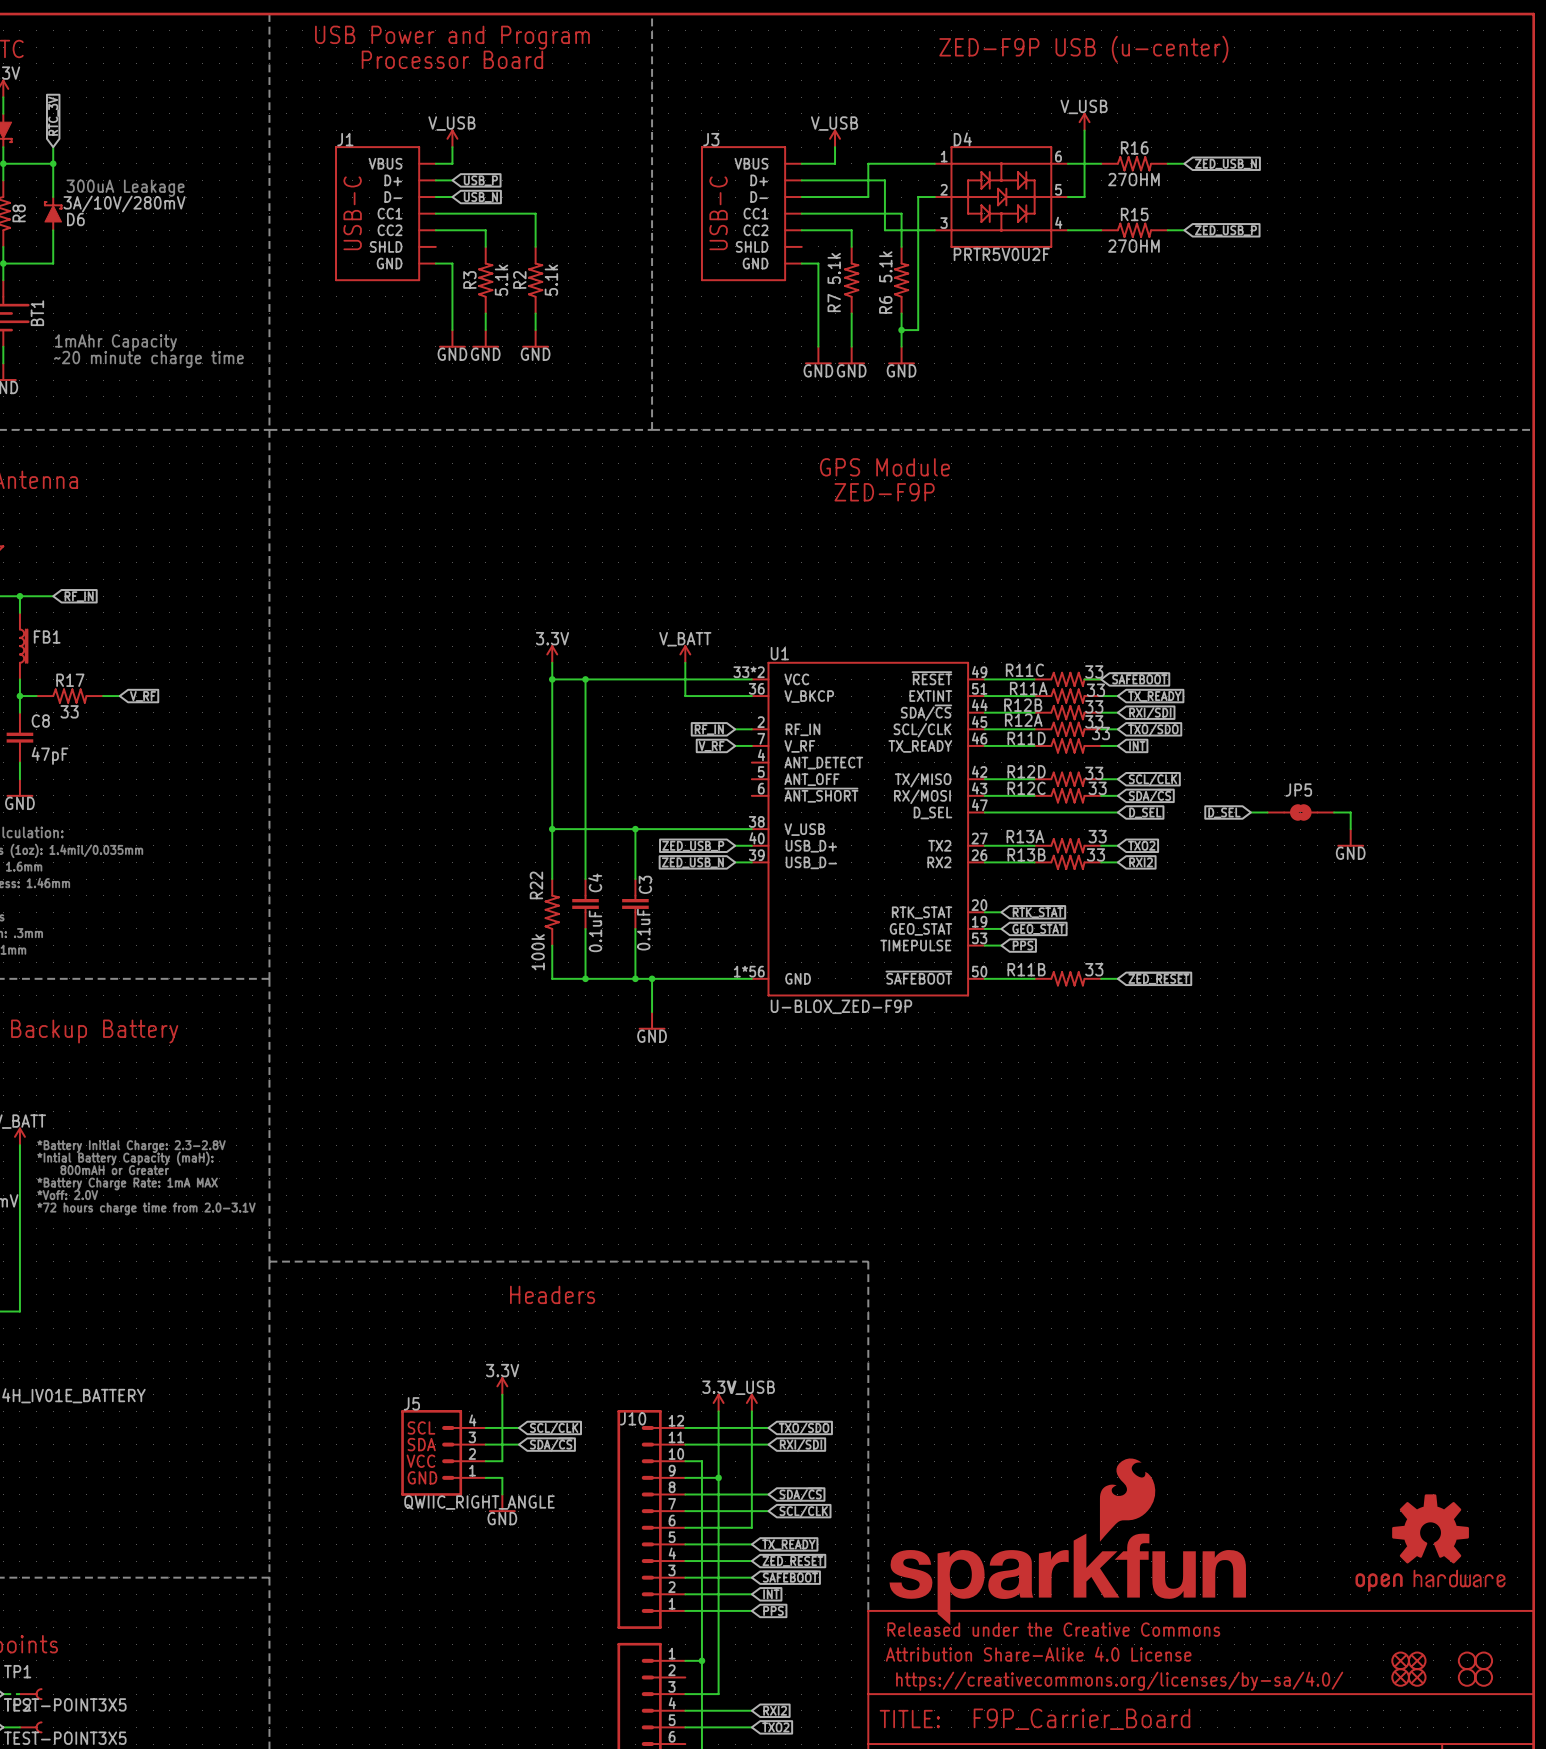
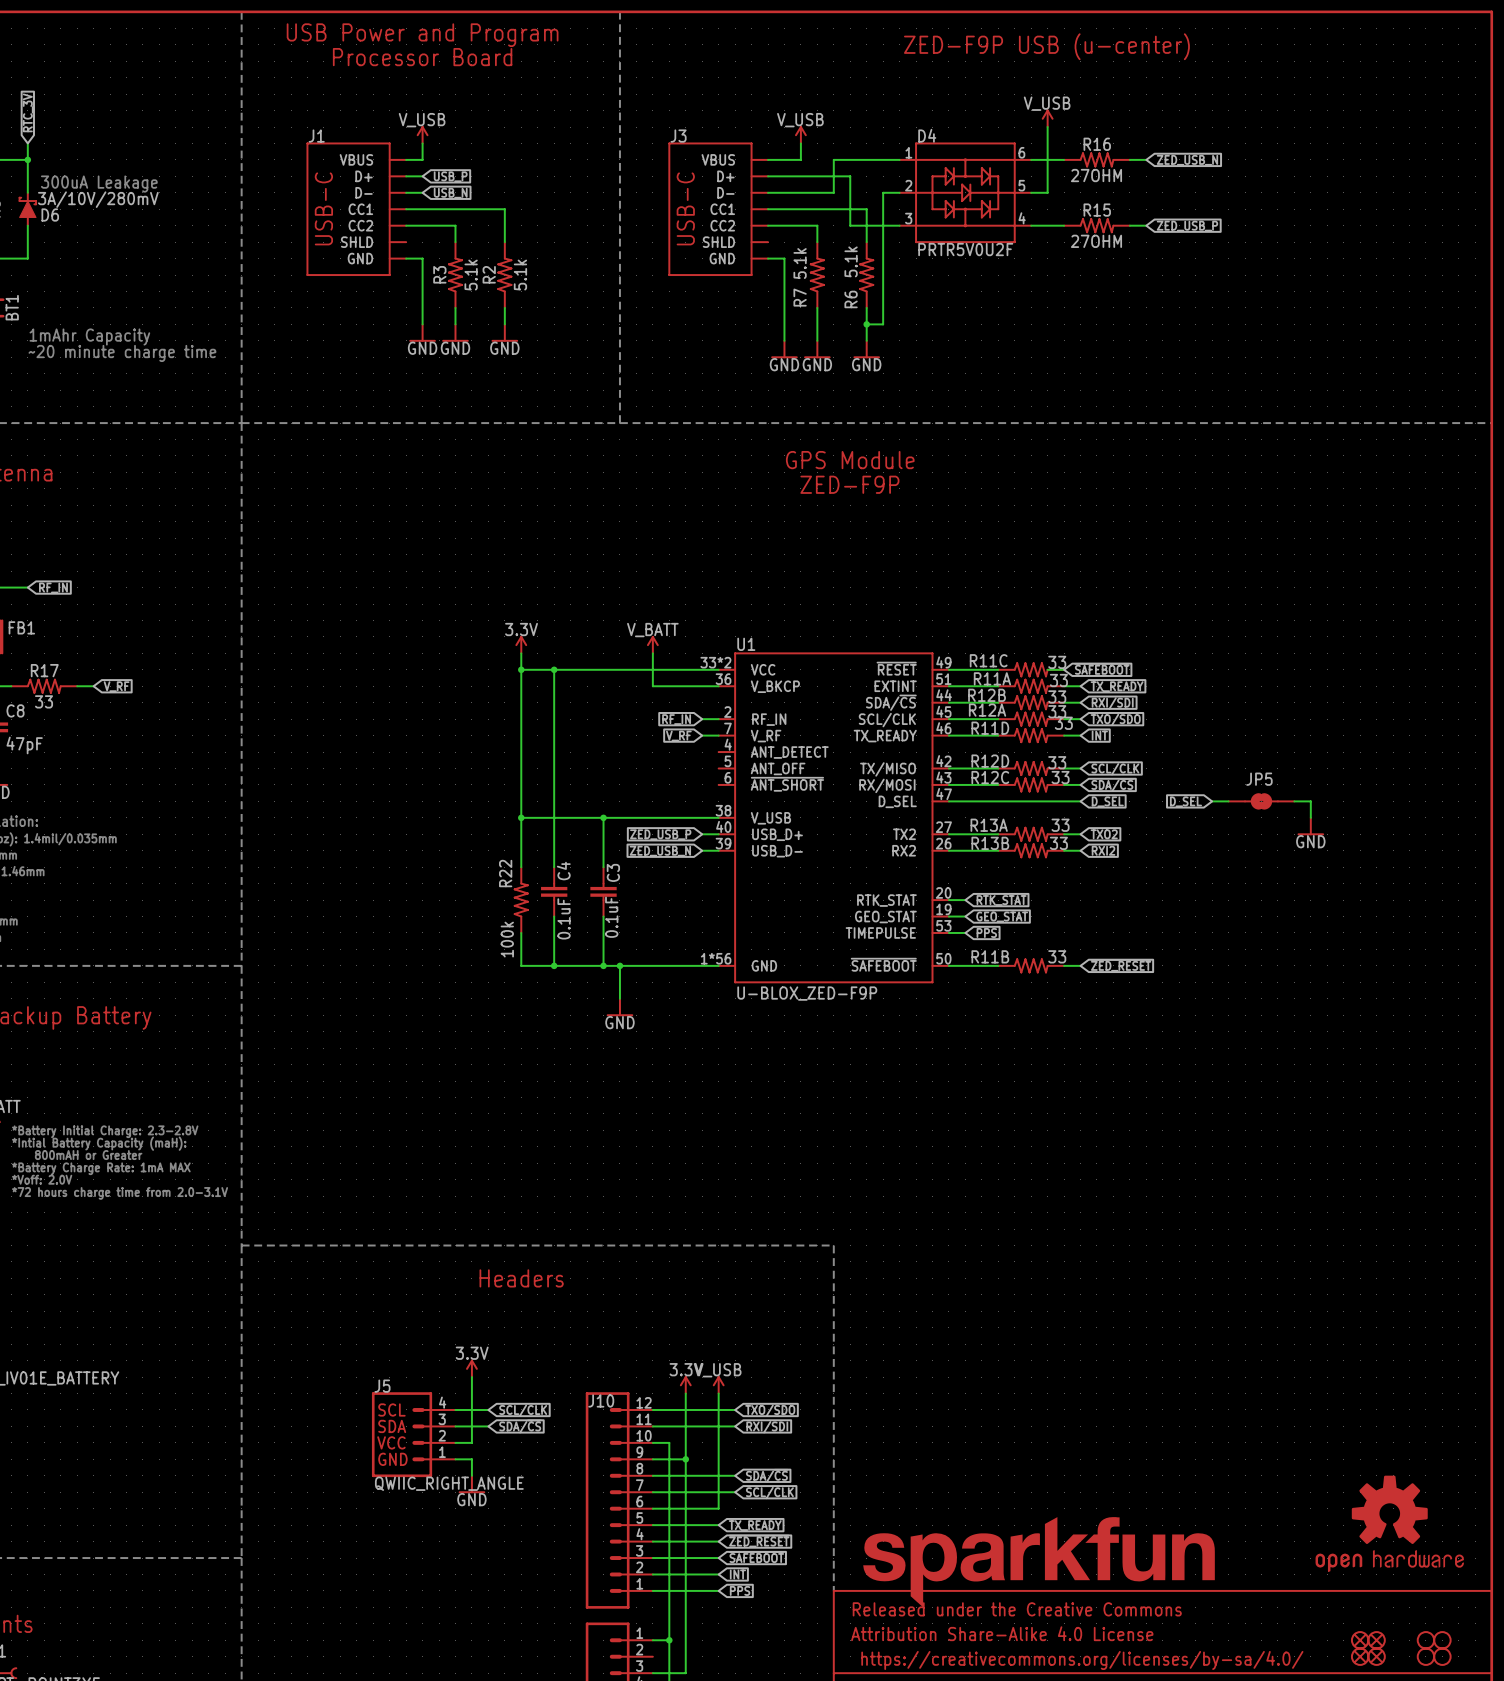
part: (1067, 1541) -> none
part: none -> (1039, 1562)

